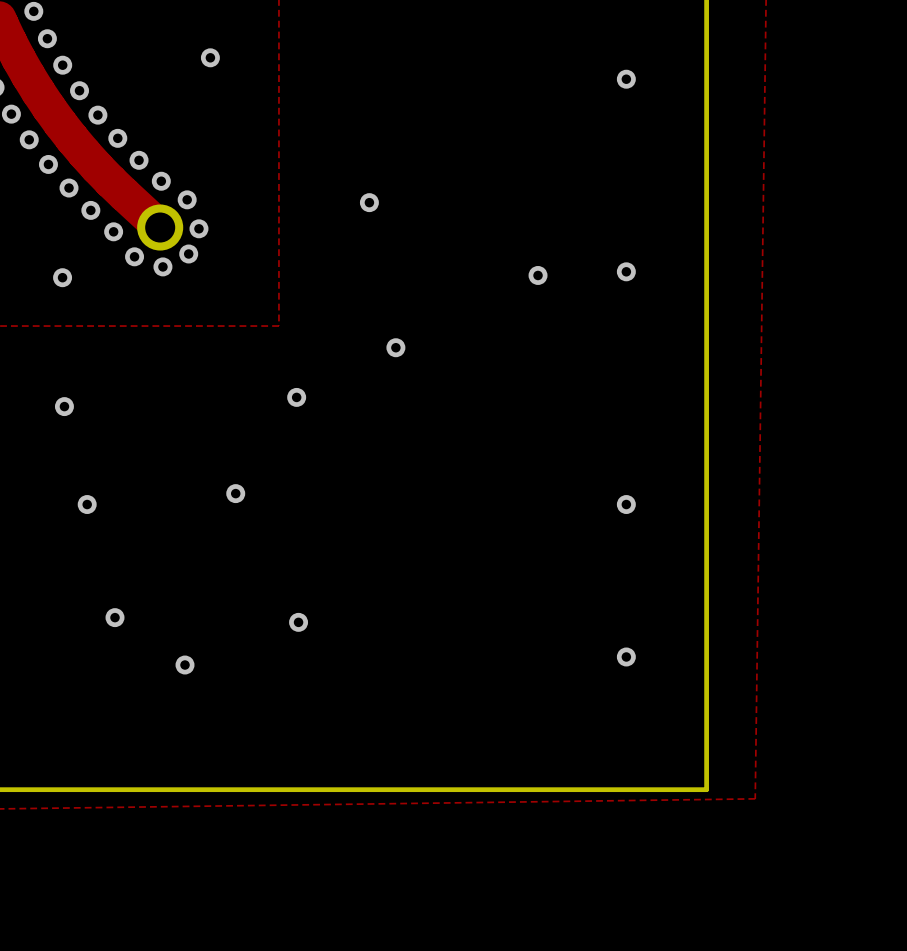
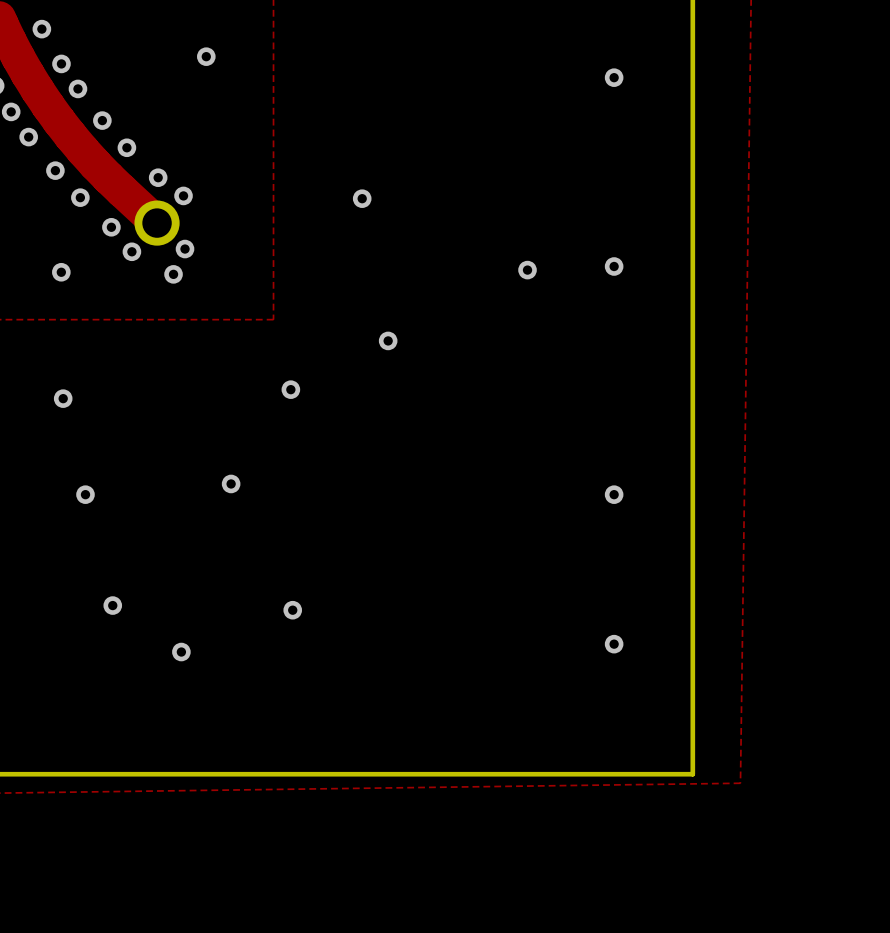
via: (33, 11) -> none
via: none -> (41, 29)
via: (47, 38) -> none
via: (97, 115) -> none
via: none -> (102, 120)
via: (117, 138) -> none
via: none -> (126, 147)
via: (139, 160) -> none
via: (48, 164) -> none
via: none -> (55, 170)
via: (69, 188) -> none
via: none -> (80, 197)
via: (90, 210) -> none
via: (198, 228) -> none
via position: (162, 266) -> (173, 274)

